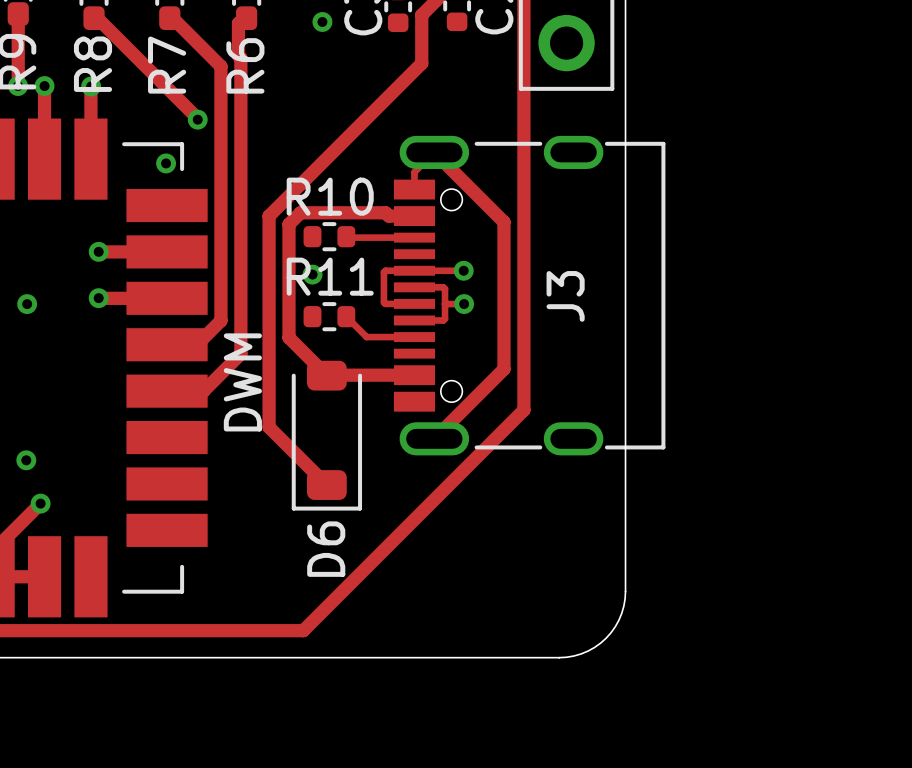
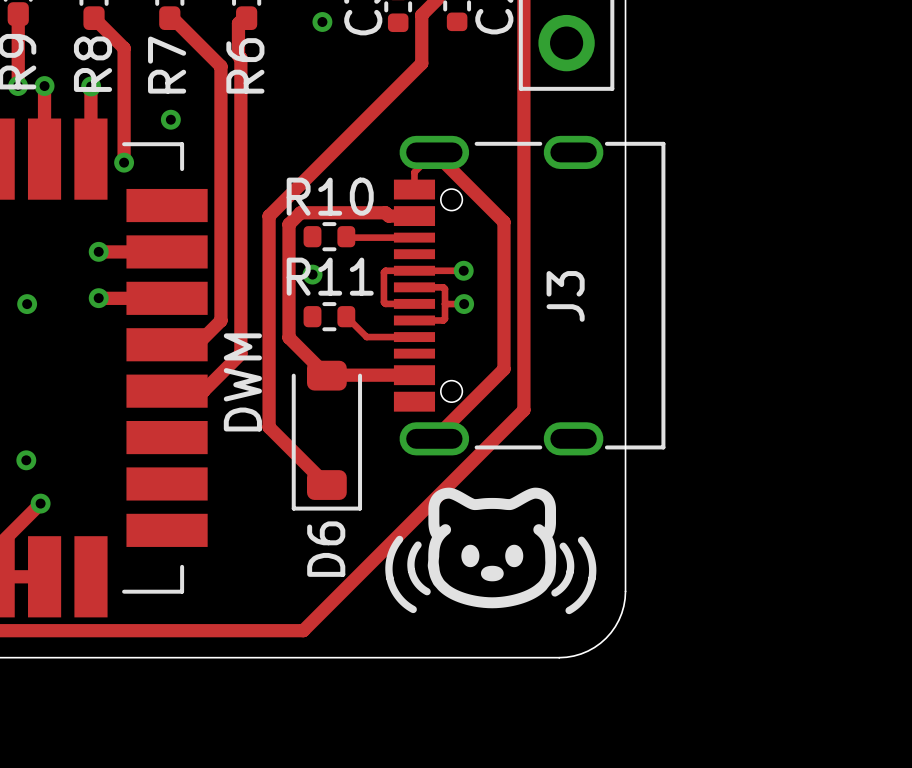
track: (94, 15) (197, 119) -> none
track: none -> (94, 18) (124, 48) (124, 162)
via: none -> (170, 119)
via: (197, 119) -> none
via: none -> (124, 162)
via: (166, 163) -> none
drawing: none -> [427, 487, 557, 609]
line: none -> (399, 539) (390, 557) (389, 577) (397, 596) (413, 609)
line: none -> (581, 540) (591, 558) (592, 578) (584, 597) (569, 610)
line: none -> (418, 545) (411, 557) (411, 570) (416, 582) (427, 591)
line: none -> (563, 546) (569, 558) (570, 571) (564, 583) (554, 592)

